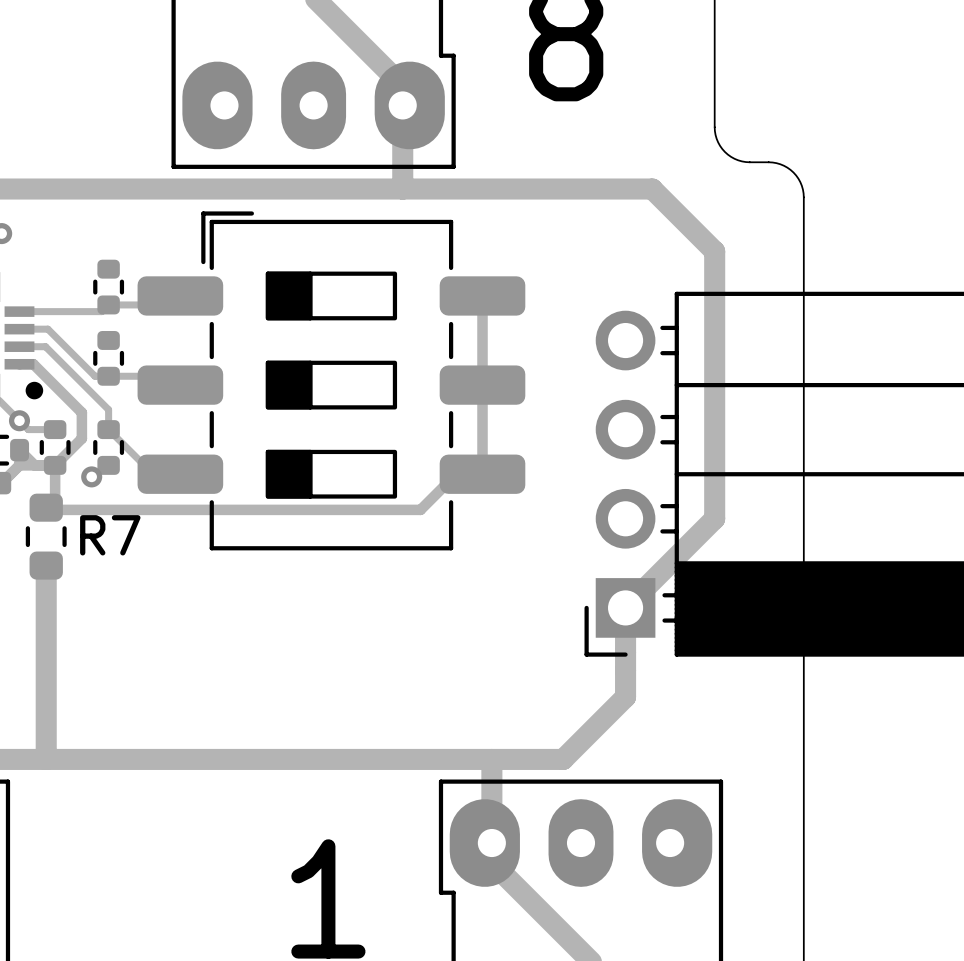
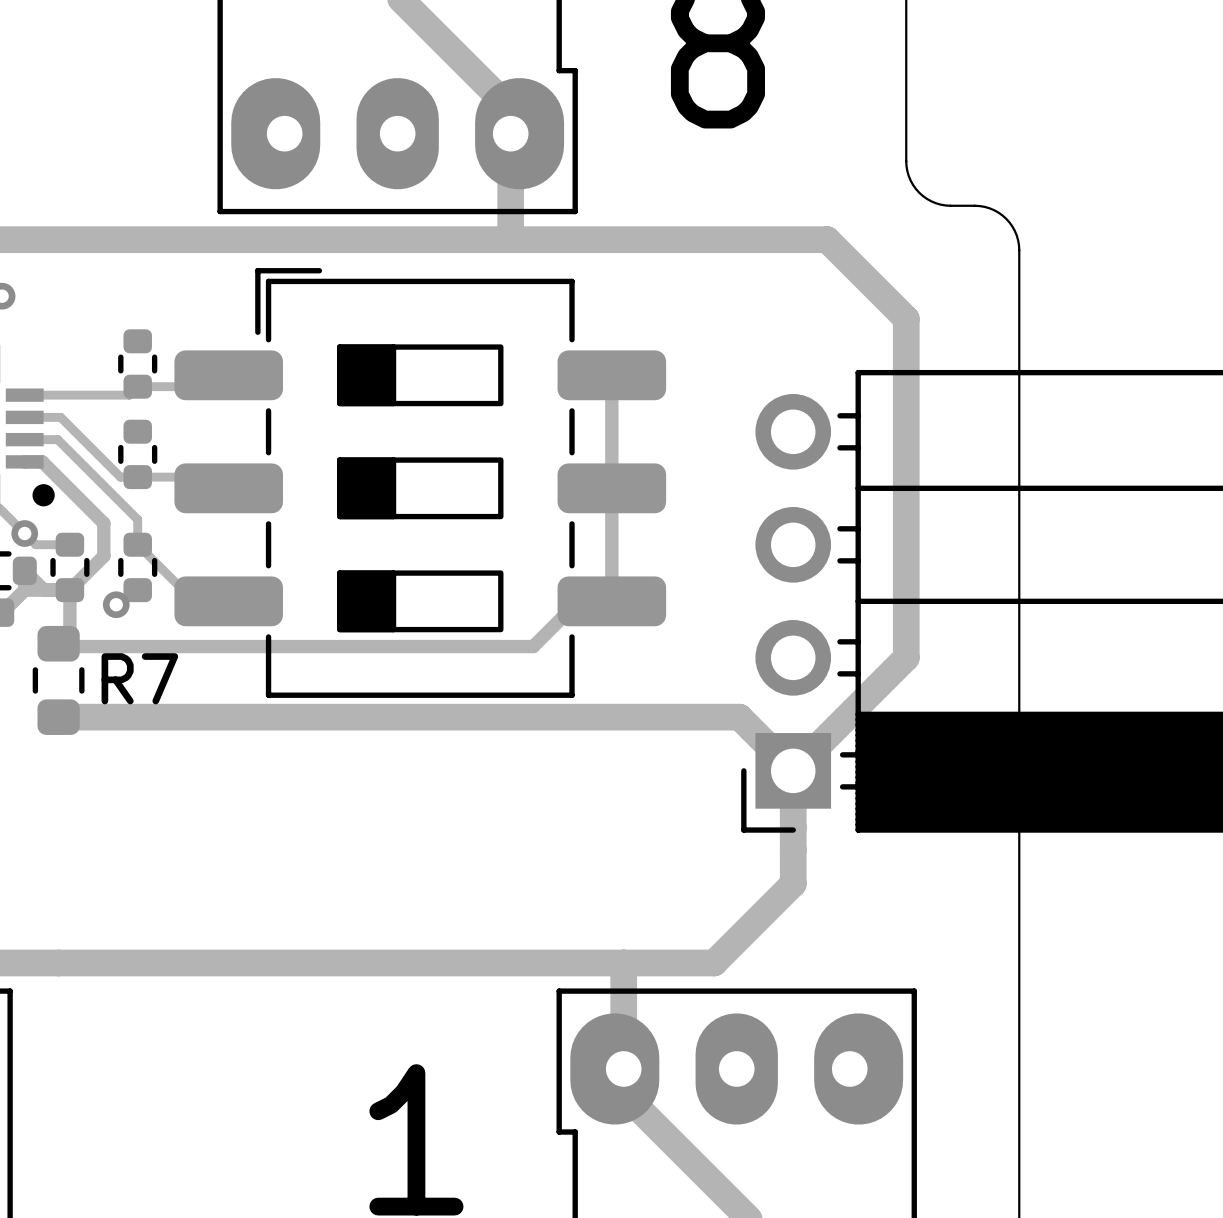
track: (46, 565) (46, 759) -> (58, 717) (739, 717) (793, 770)

